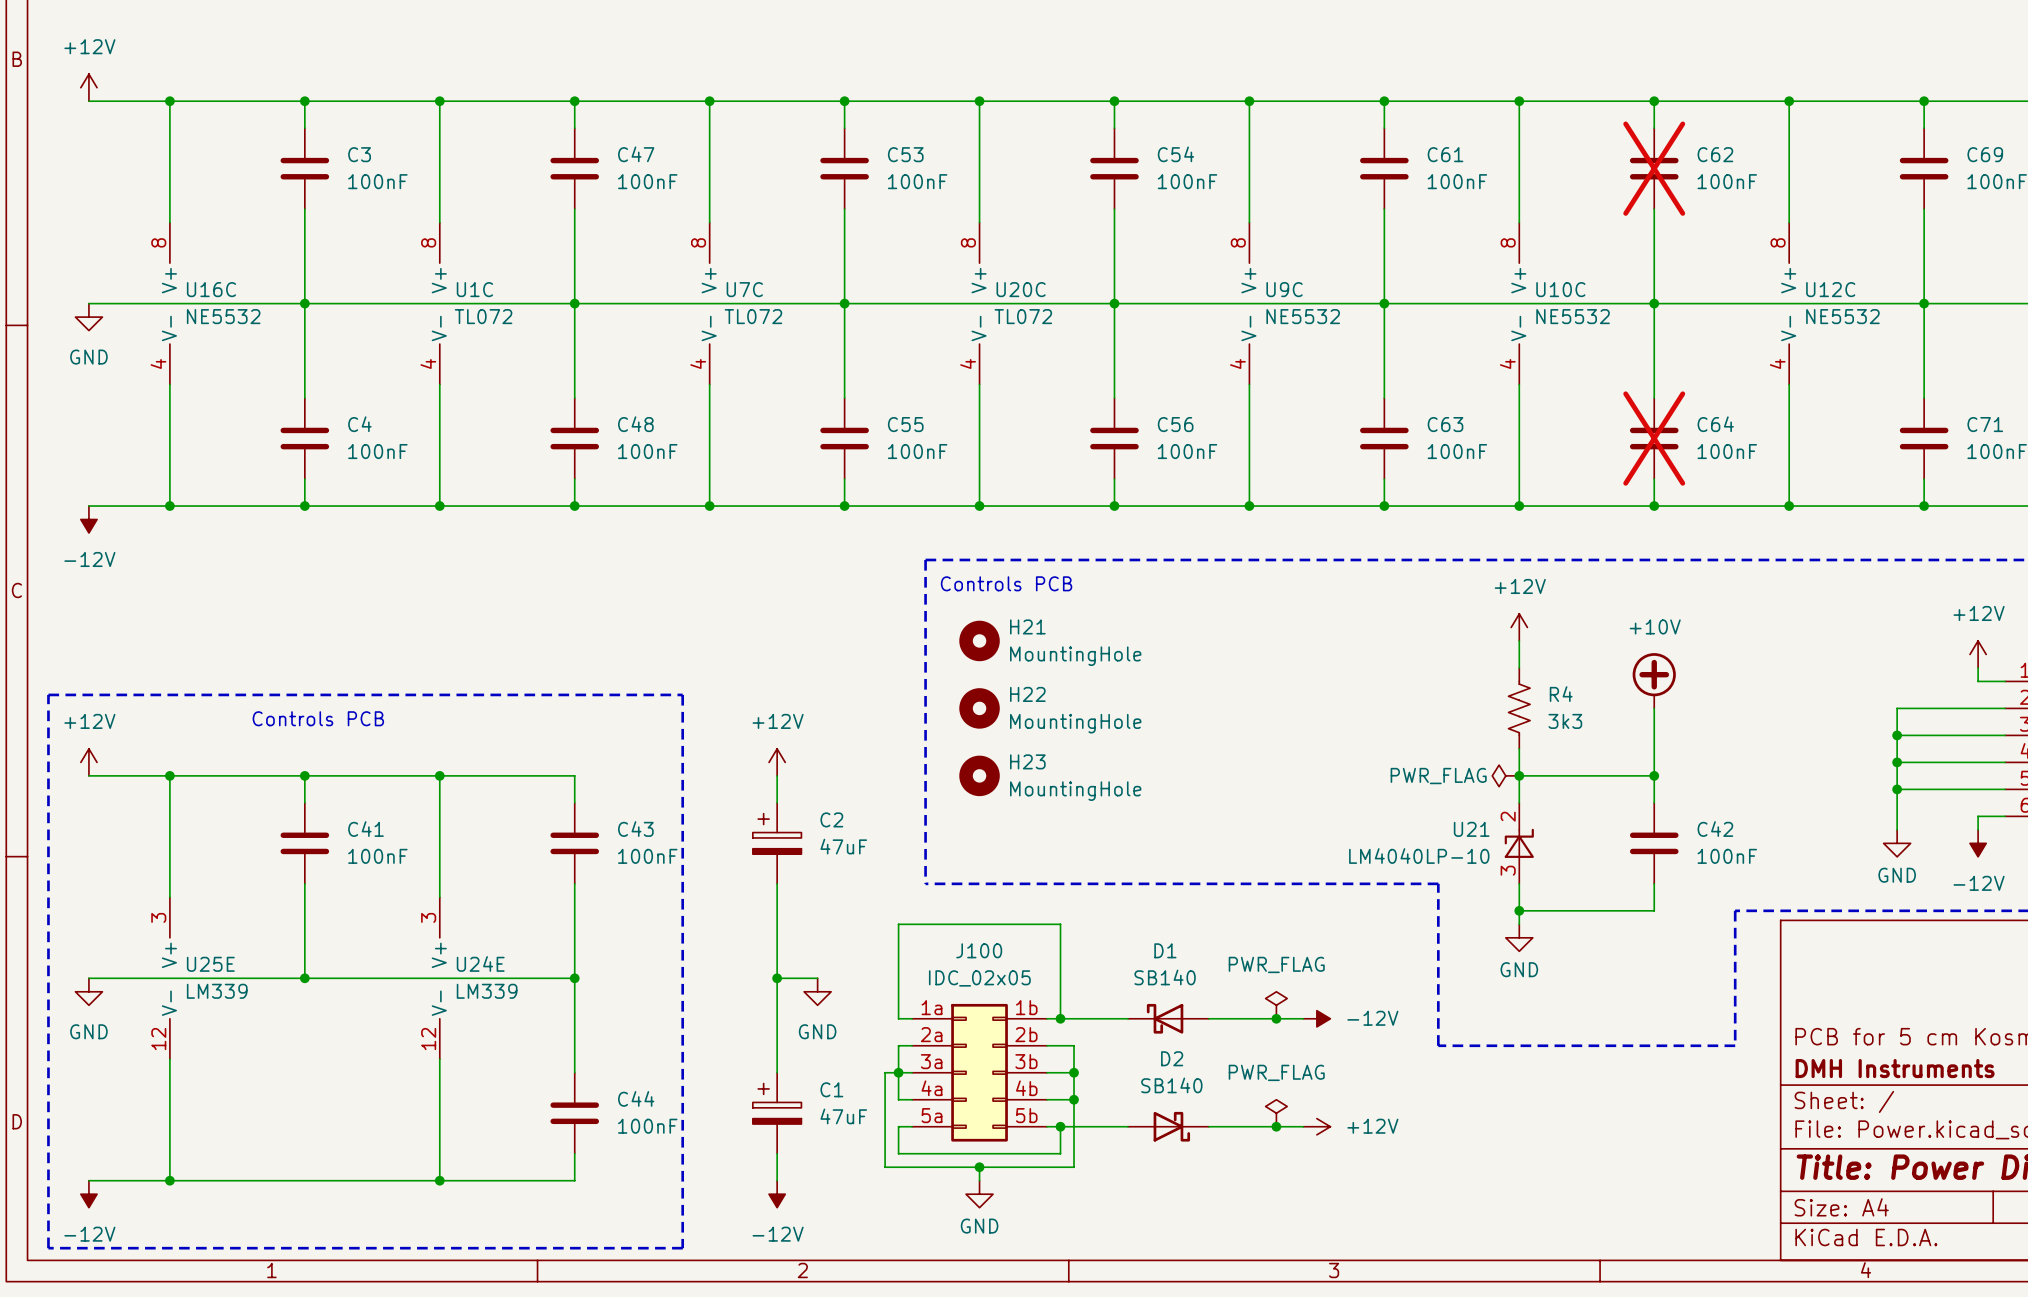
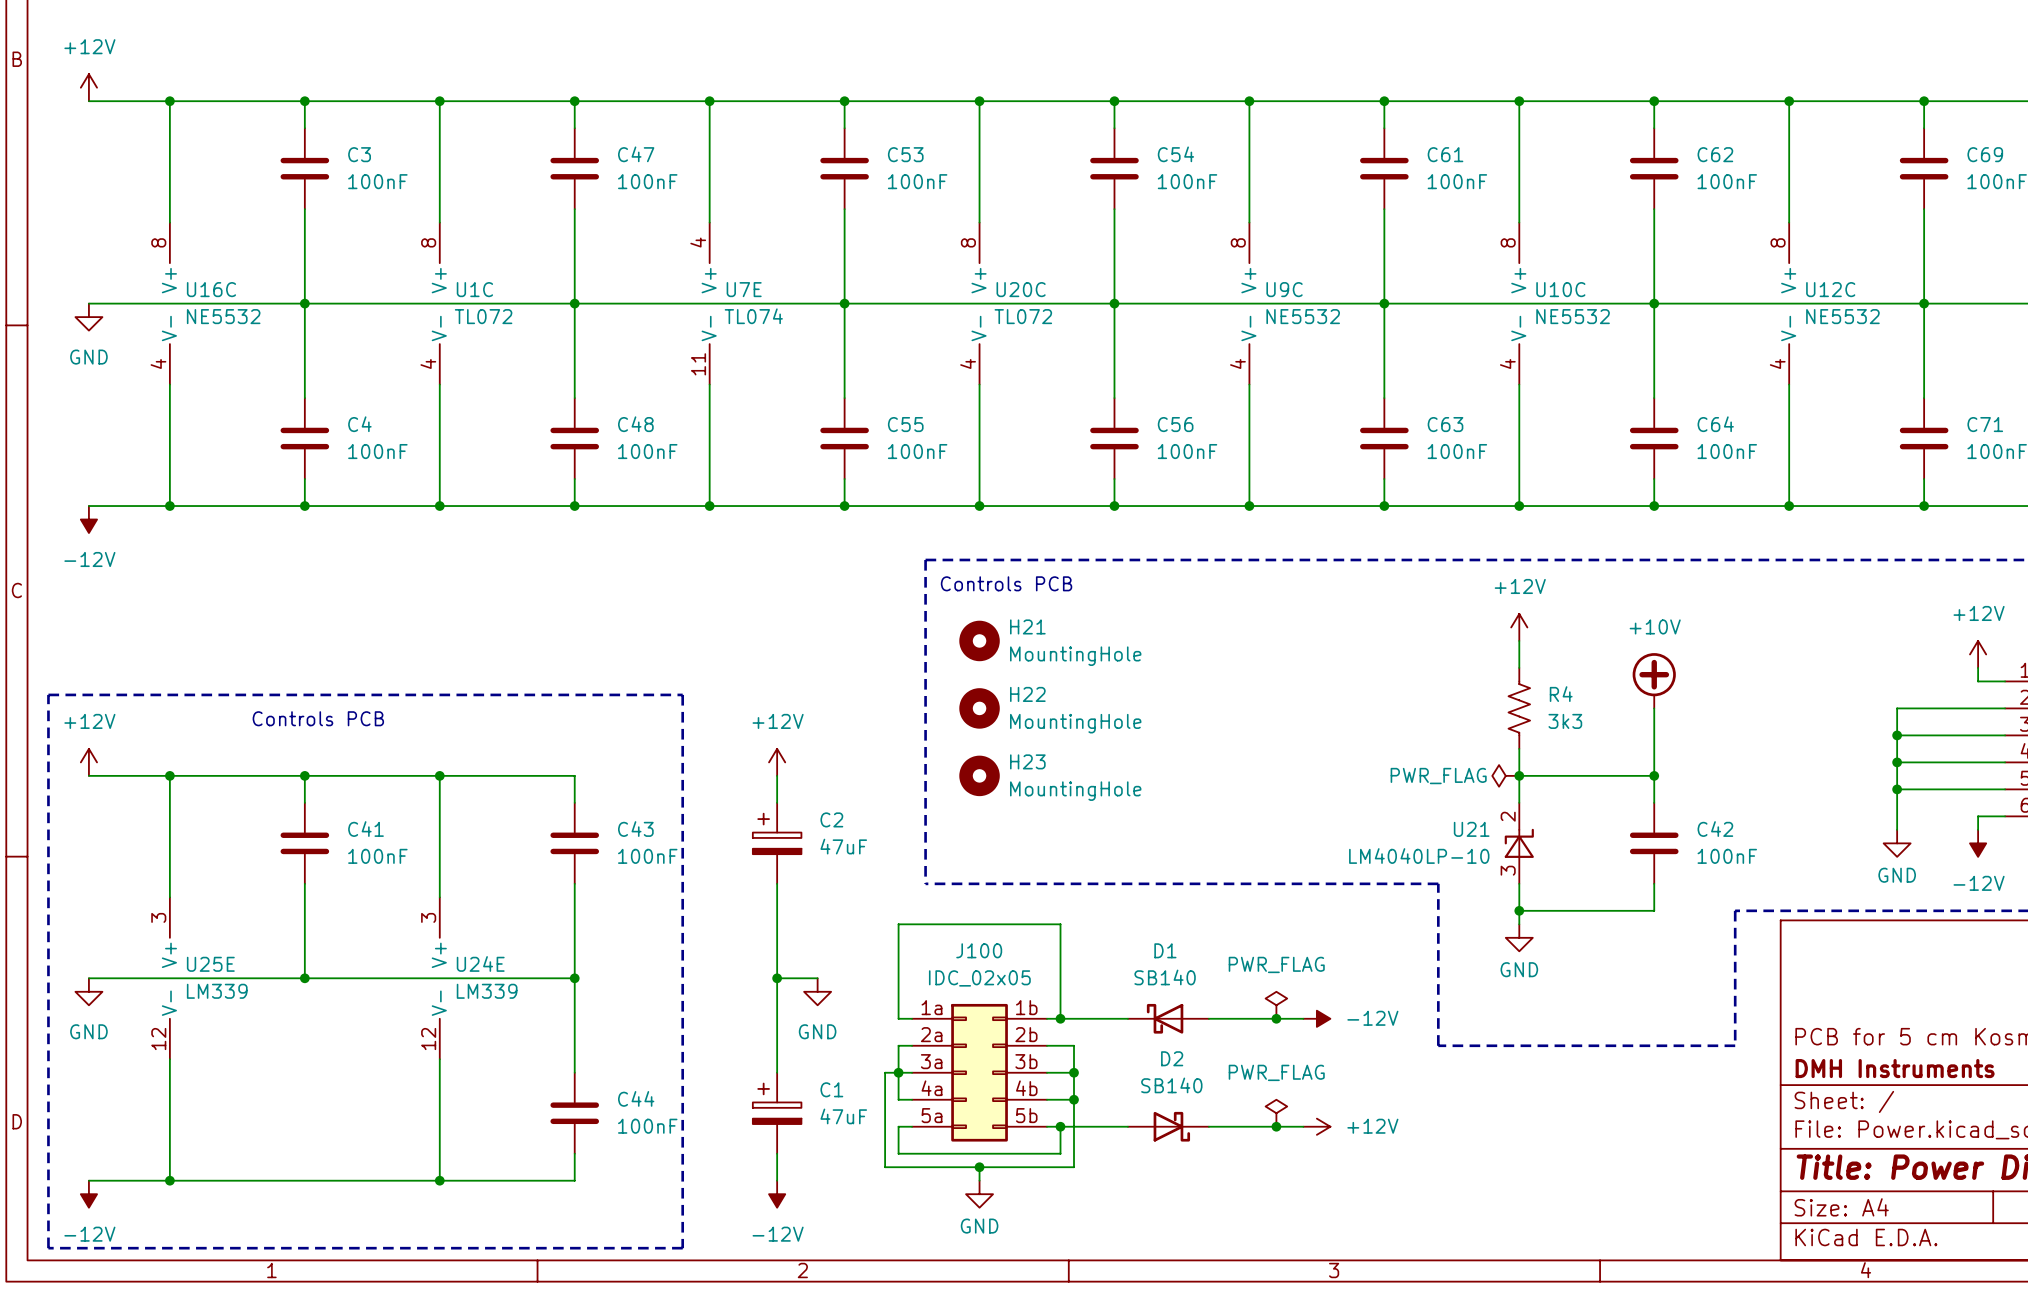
C62 do-not-place cross: (1654, 168) -> none
U7C pin number: 8 (698, 242) -> 4 (698, 242)
U7C name: U7C (744, 289) -> U7E (744, 289)
U7C value: TL072 (753, 316) -> TL074 (753, 316)
U7C pin number: 4 (698, 364) -> 11 (698, 364)
C64 do-not-place cross: (1654, 438) -> none

